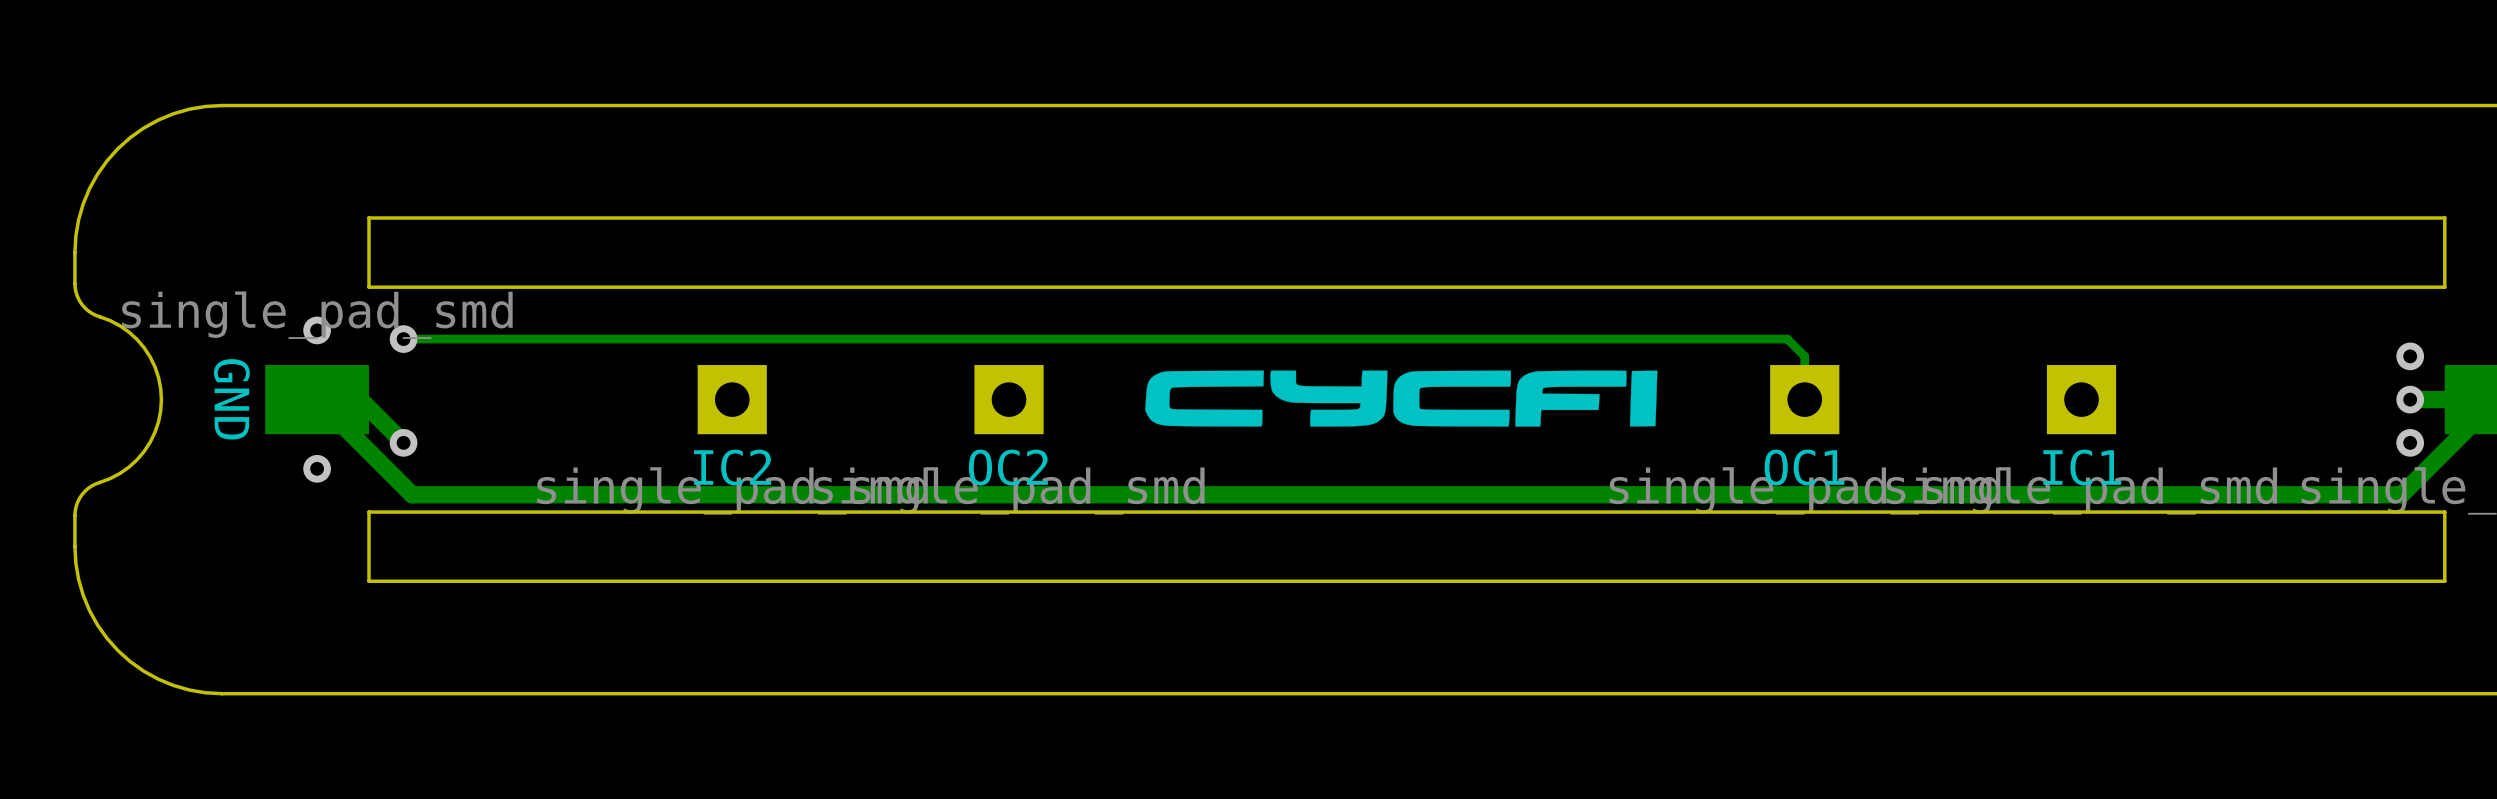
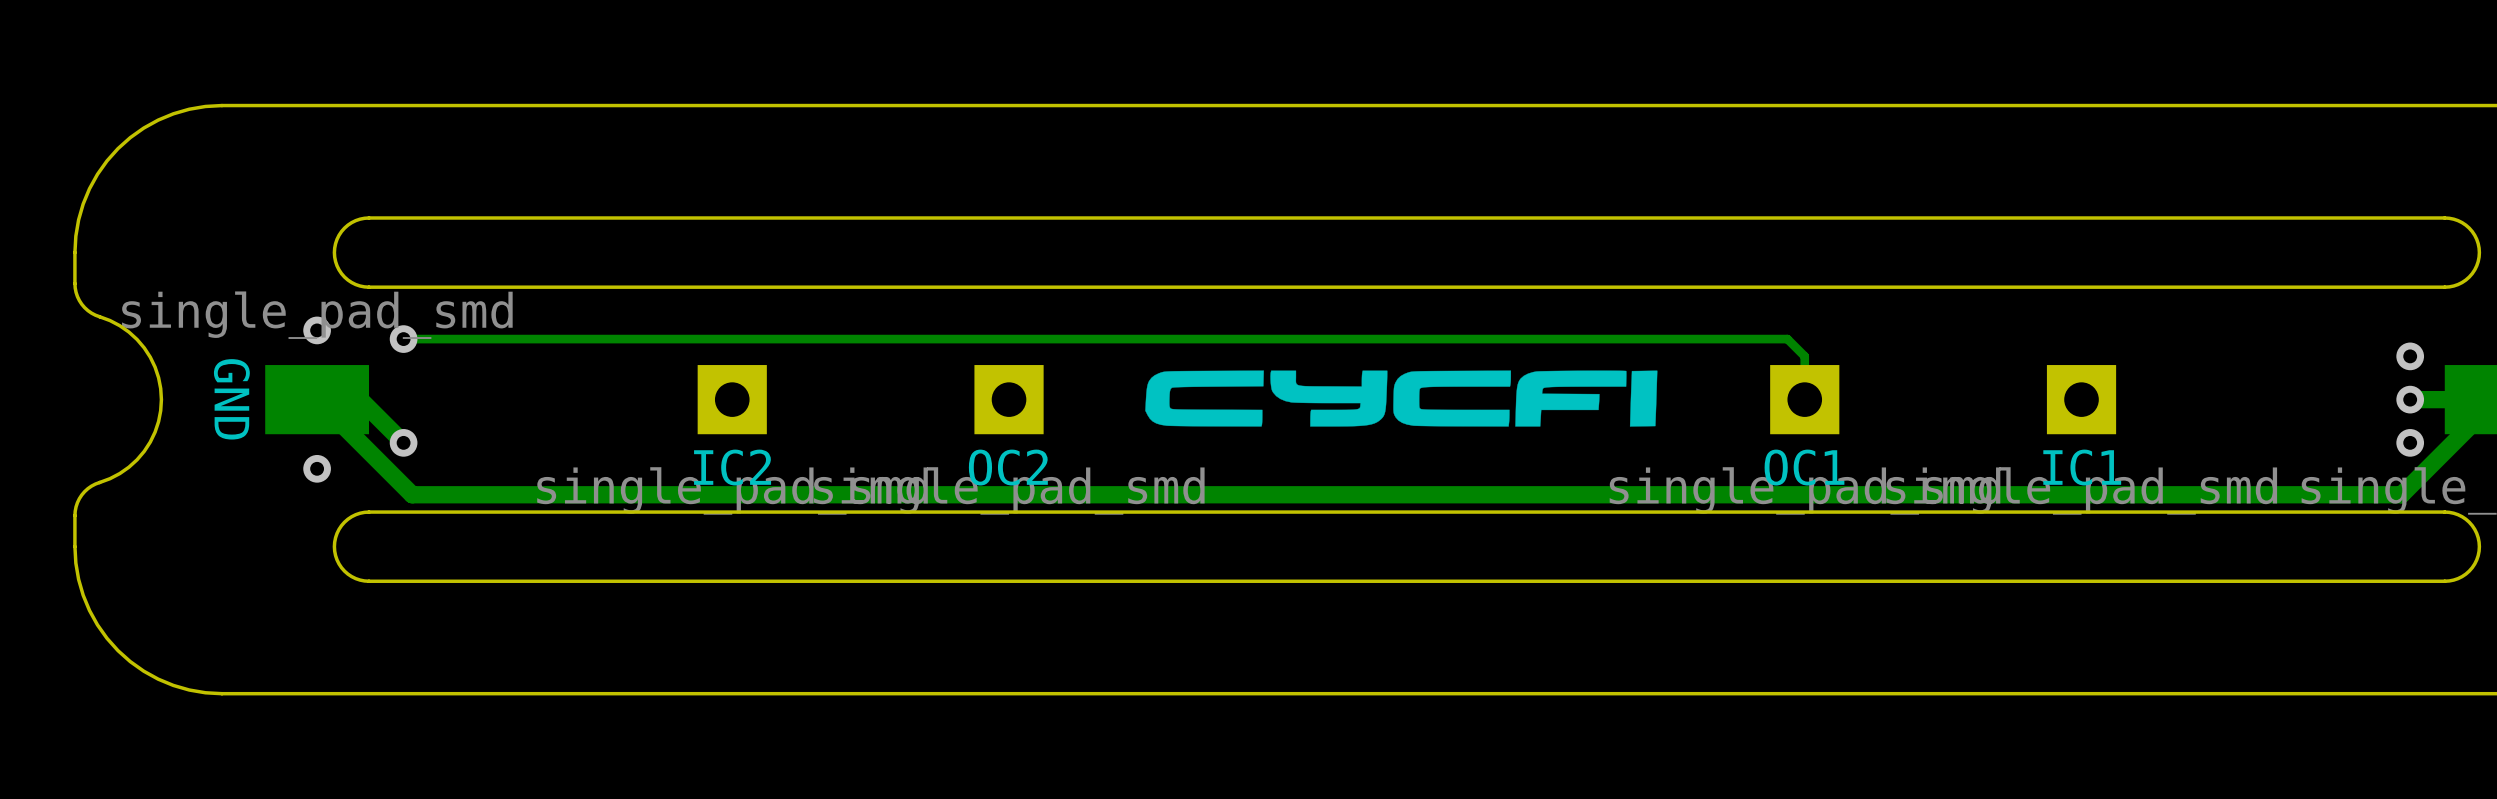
board edge: (368, 217) (368, 287) -> (368, 217) (355, 220) (344, 228) (337, 239) (334, 252) (337, 265) (344, 277) (355, 284) (368, 287)
board edge: (2444, 217) (2444, 287) -> (2444, 217) (2458, 220) (2469, 228) (2476, 239) (2479, 252) (2476, 265) (2469, 277) (2458, 284) (2444, 287)
board edge: (368, 512) (368, 581) -> (368, 512) (355, 514) (344, 522) (337, 533) (334, 546) (337, 559) (344, 571) (355, 578) (368, 581)
board edge: (2444, 512) (2444, 581) -> (2444, 512) (2458, 514) (2469, 522) (2476, 533) (2479, 546) (2476, 559) (2469, 571) (2458, 578) (2444, 581)

